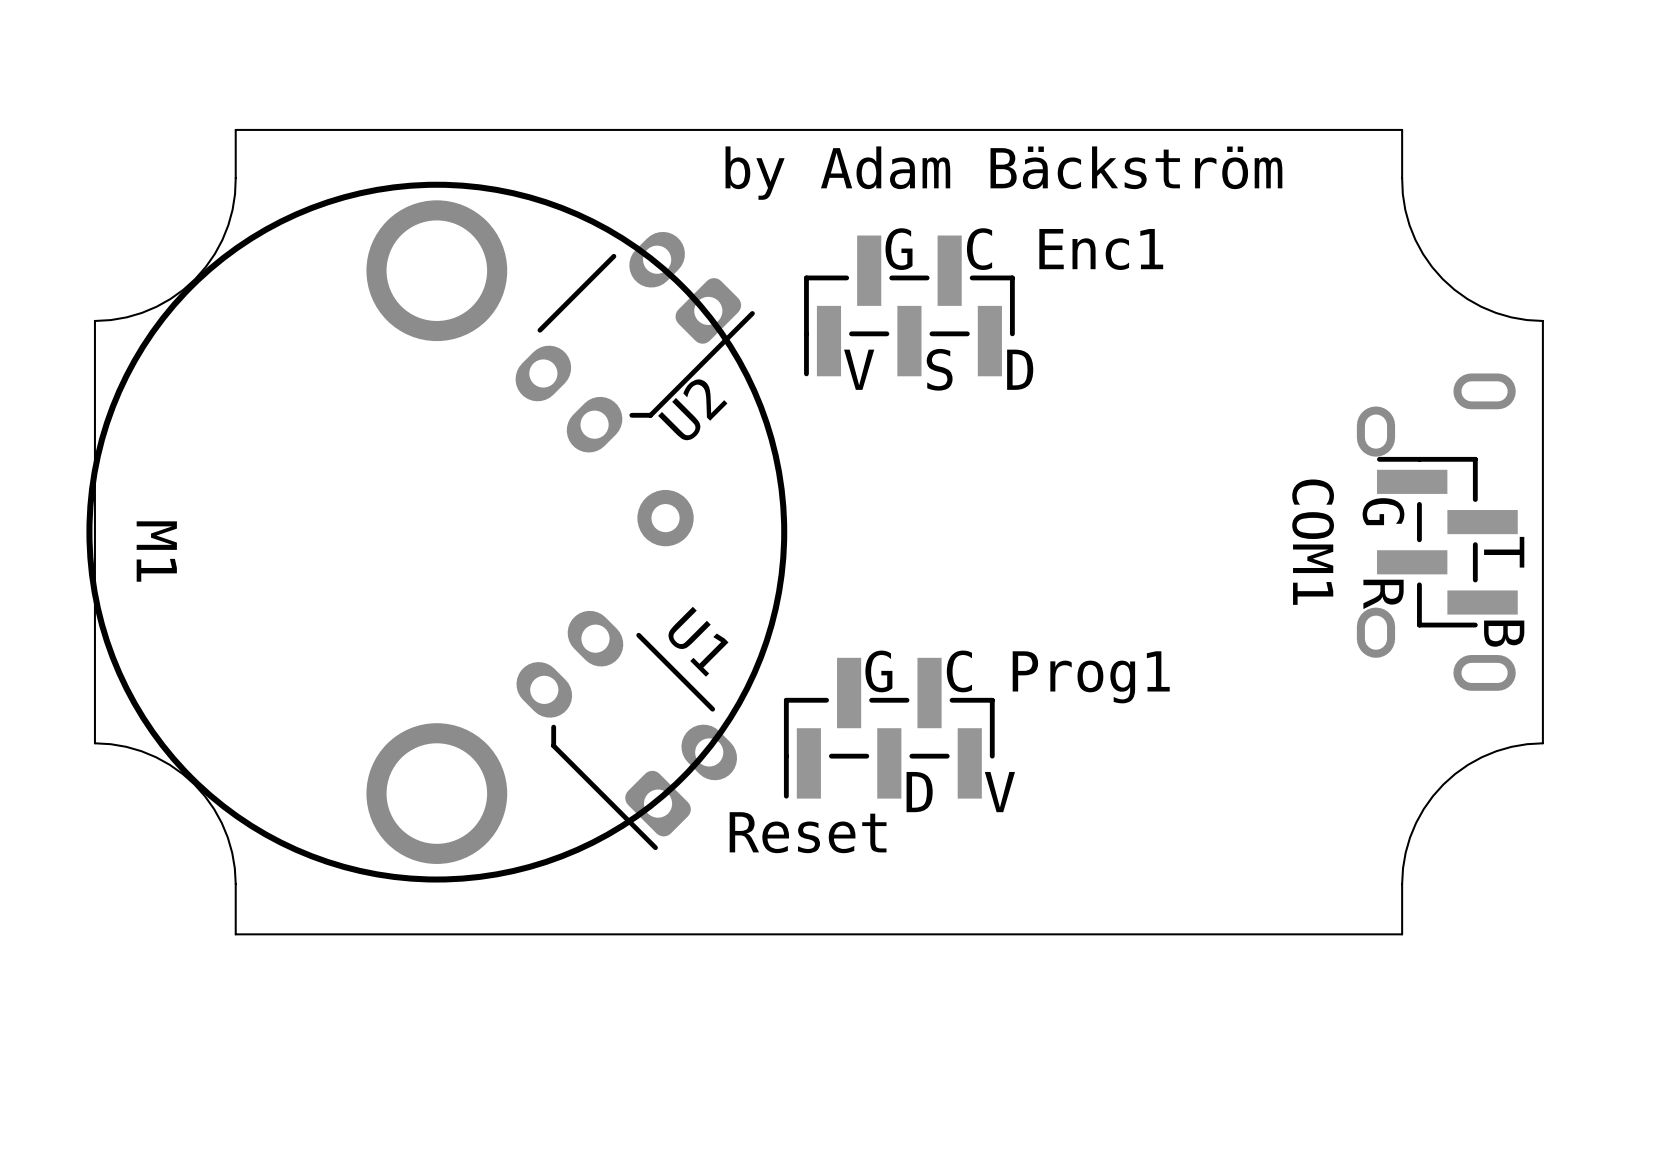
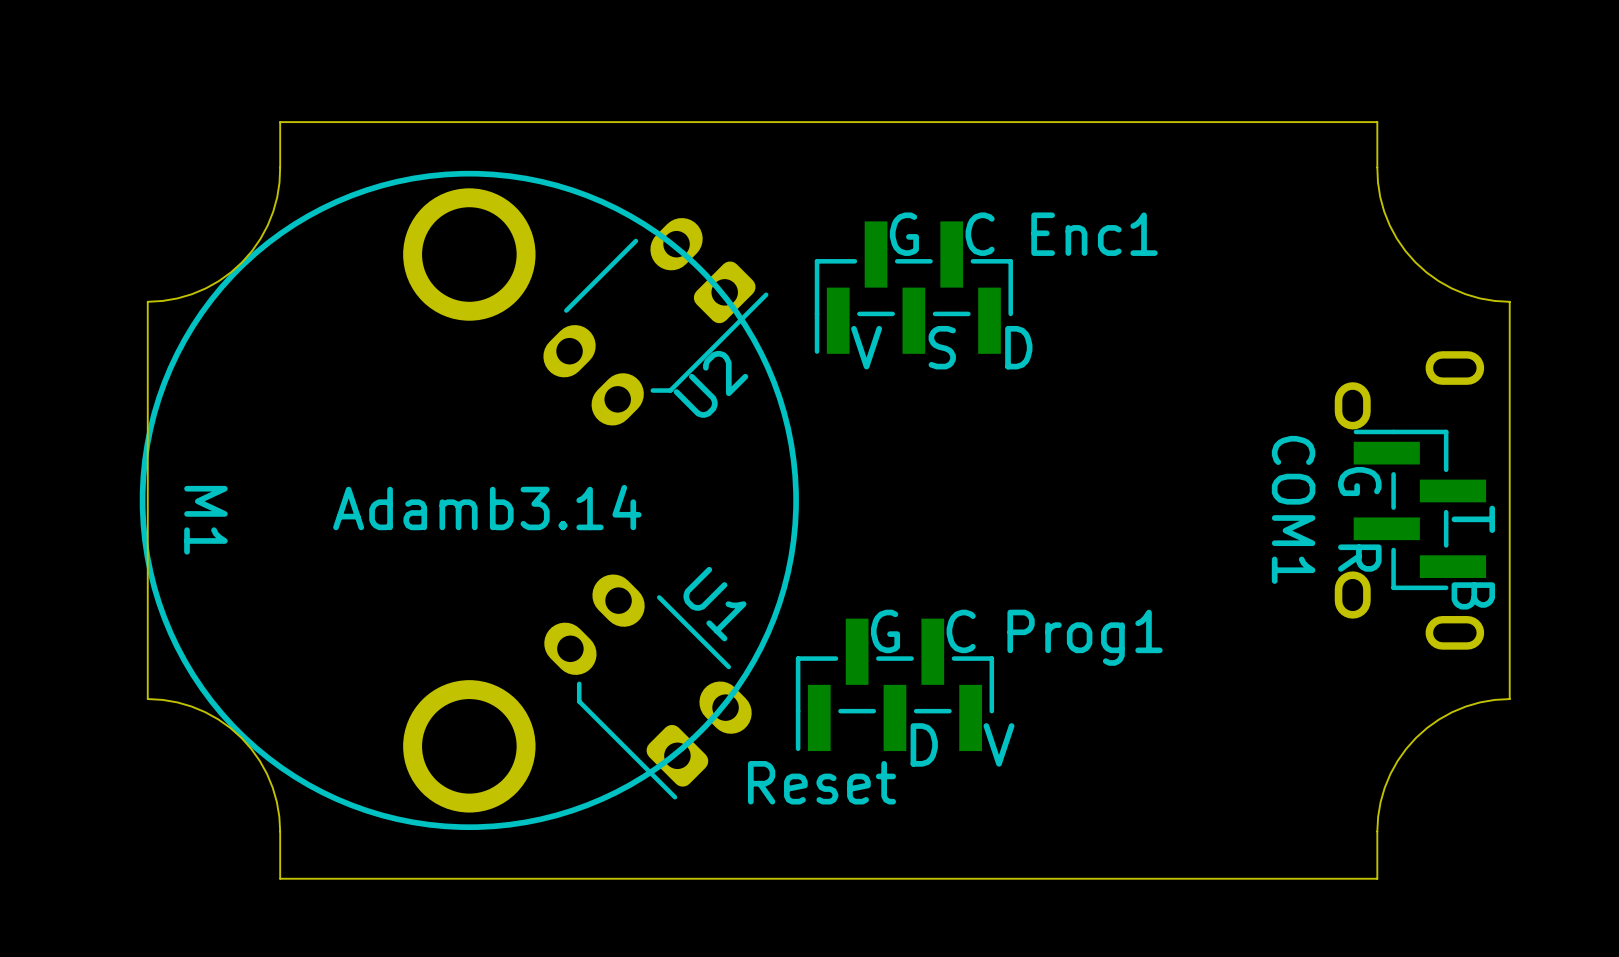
text: by Adam Bäckström (1003, 173) -> none
part: (665, 518) -> none
text: none -> Adamb3.14 (487, 507)

